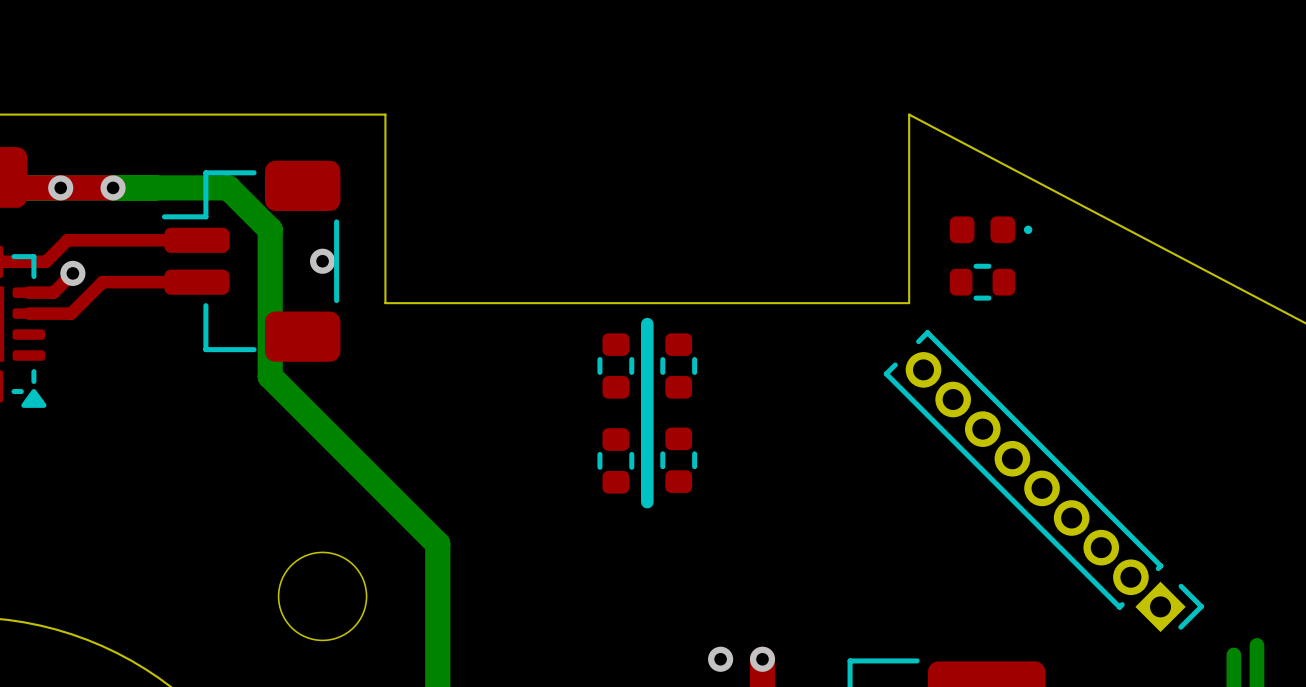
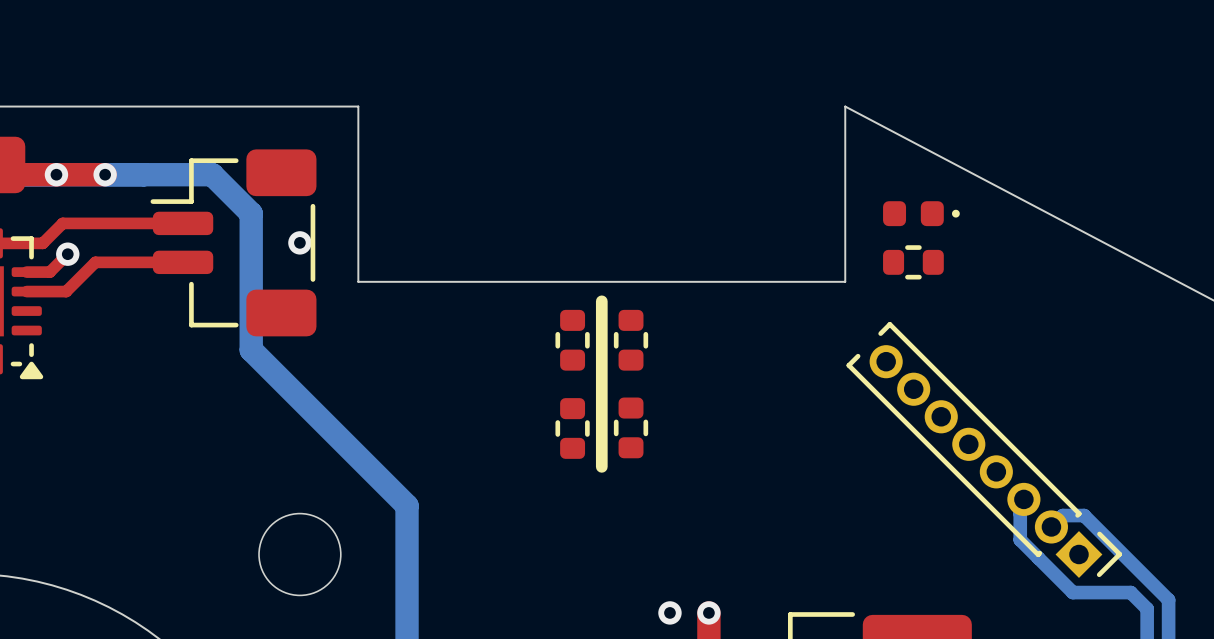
part footprint: [883, 330, 1204, 633] -> [846, 322, 1123, 578]
bottom track: none -> (1023, 499) (1020, 503) (1020, 539) (1072, 592) (1130, 592) (1147, 608)
bottom track: none -> (1051, 526) (1062, 515) (1084, 515) (1168, 600)

